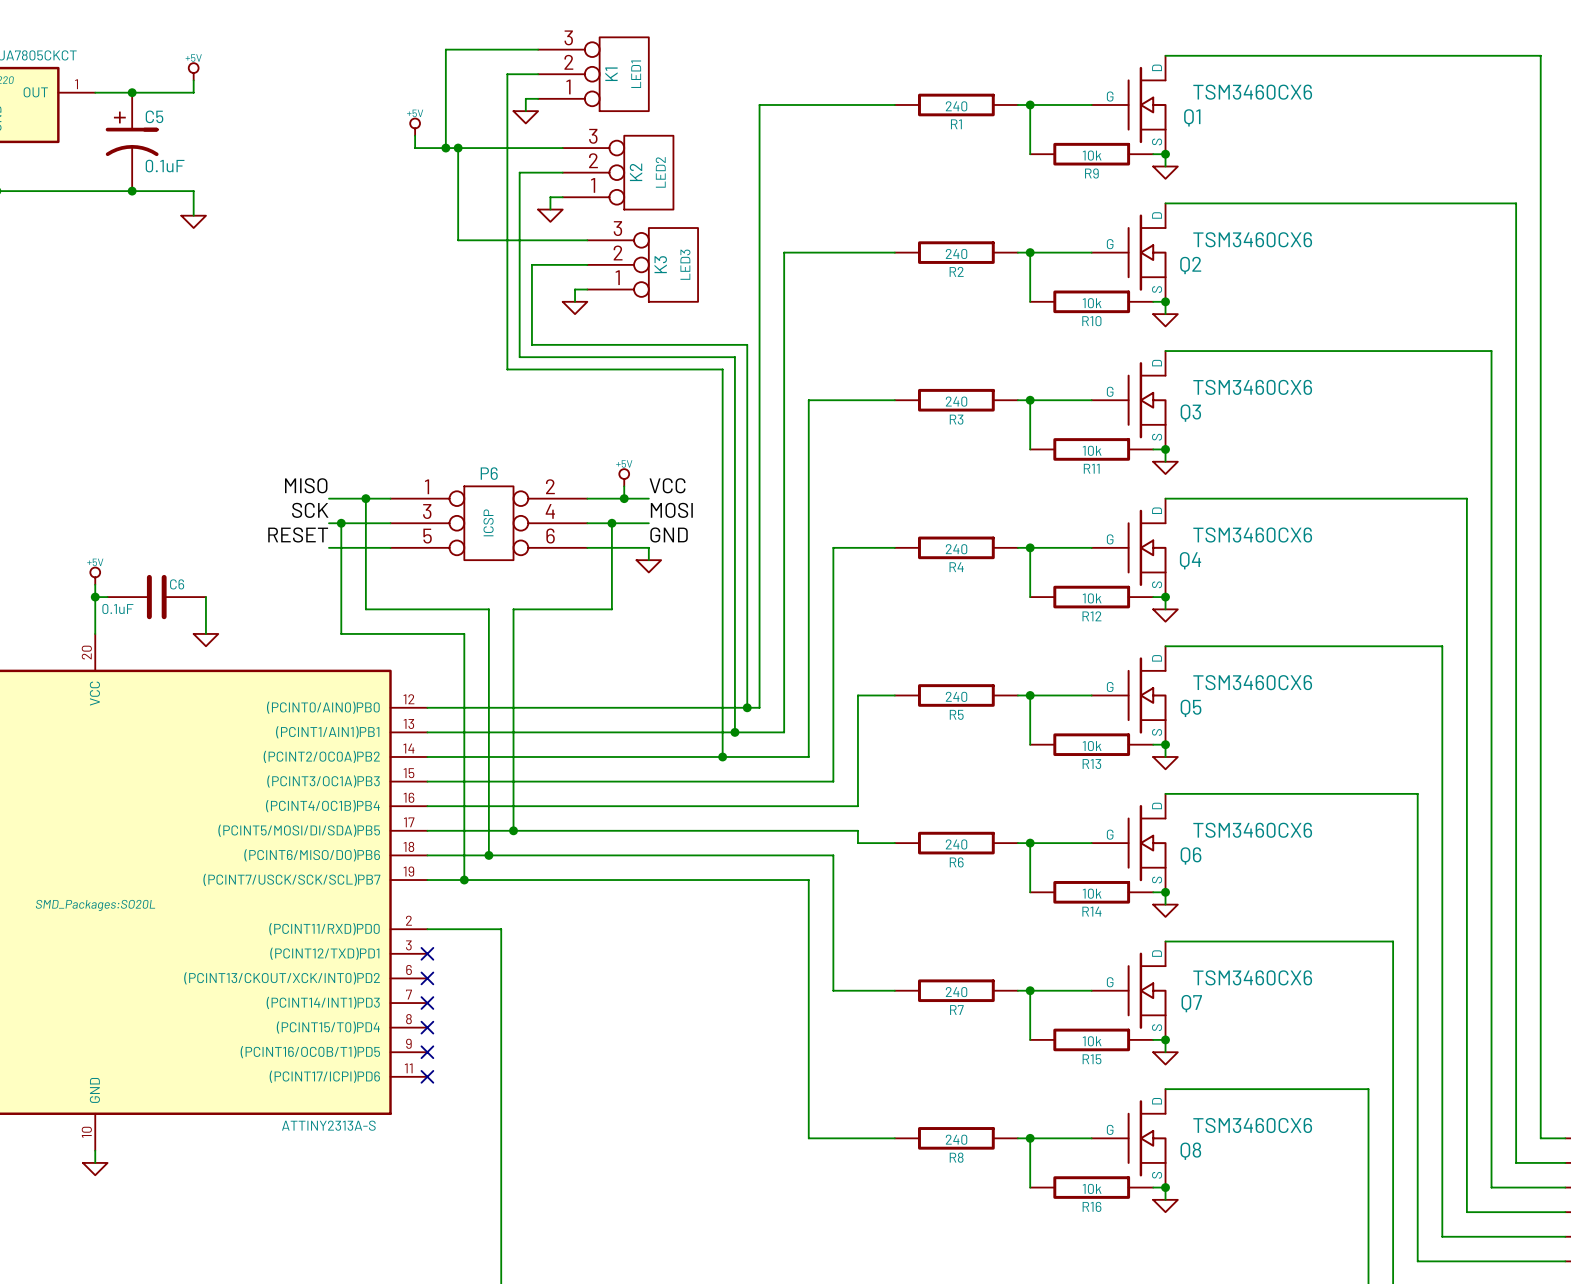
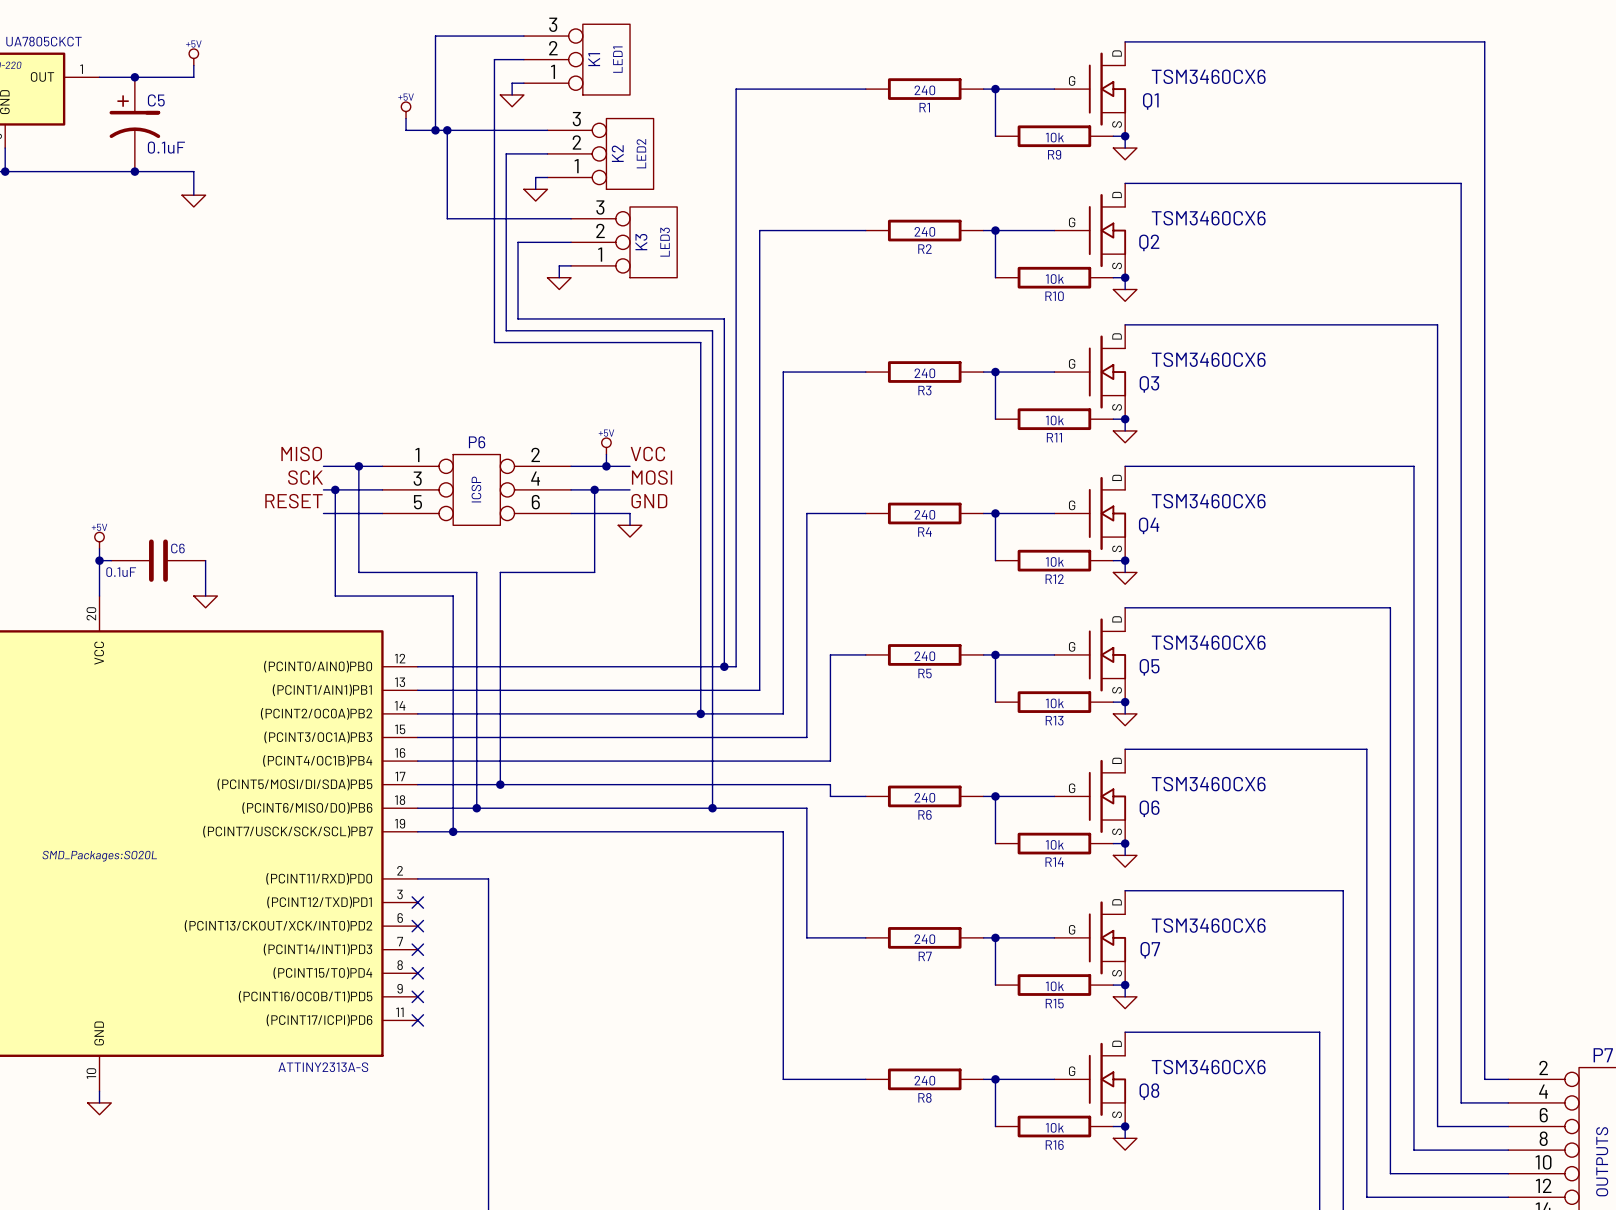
wire: none -> (712, 690) (712, 808)
junction: (734, 732) -> none
junction: none -> (712, 808)

